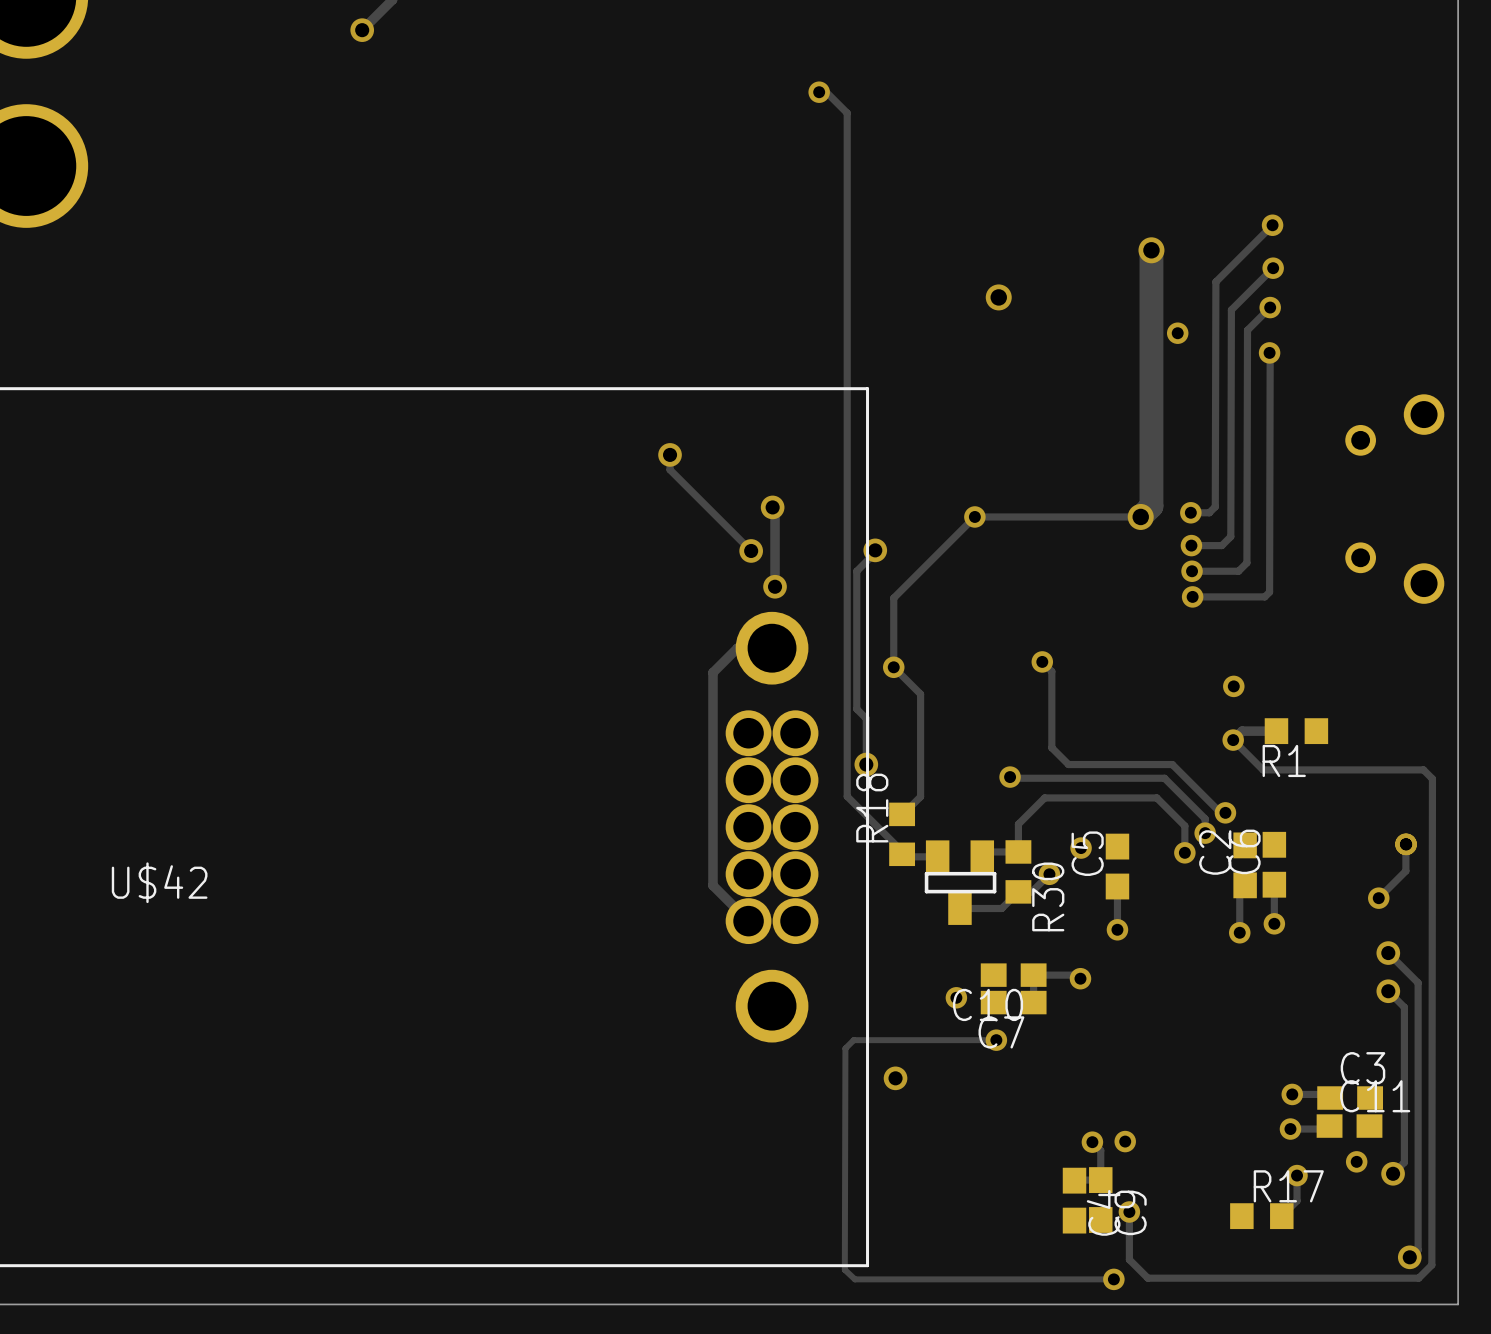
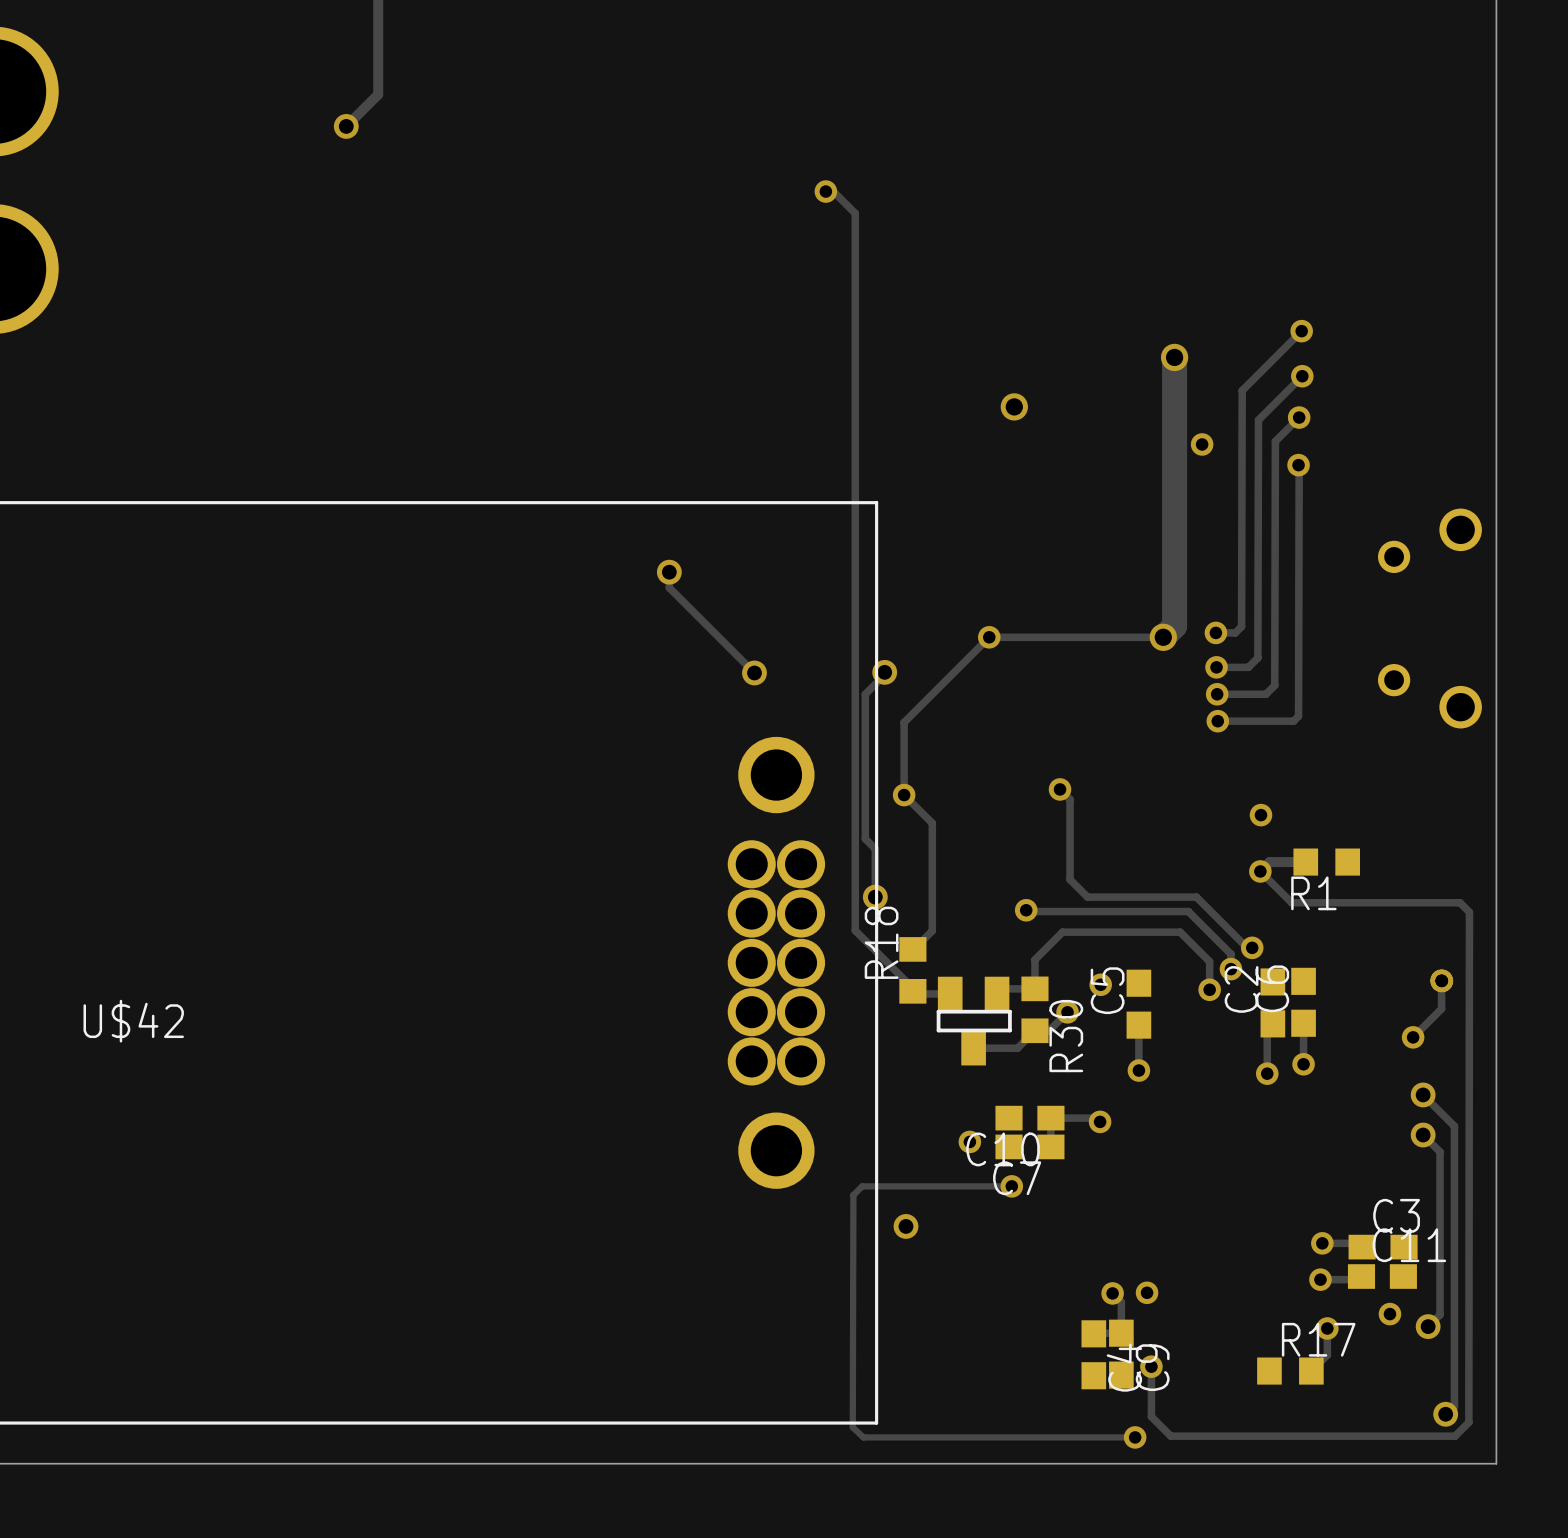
track: (772, 507) (775, 509) (775, 586) -> none
via: (772, 507) -> none
via: (775, 586) -> none
track: (772, 648) (737, 648) (712, 672) (712, 885) (748, 921) -> none

